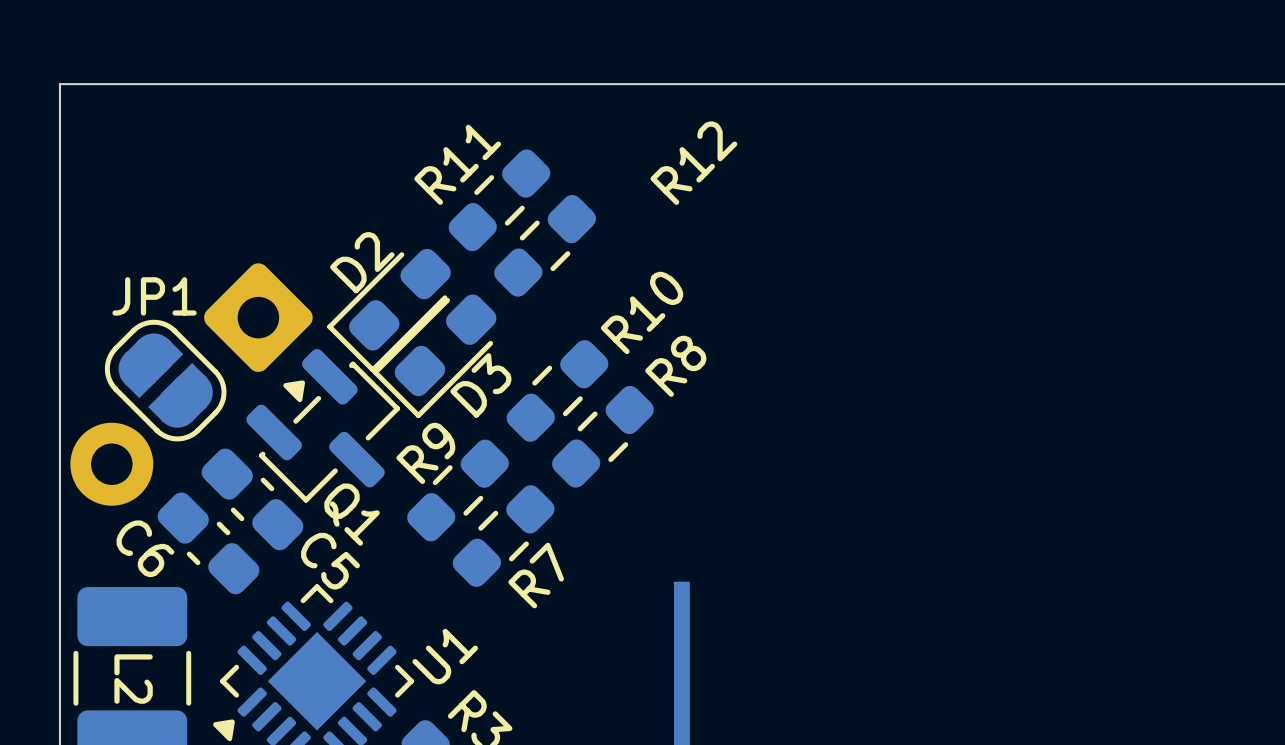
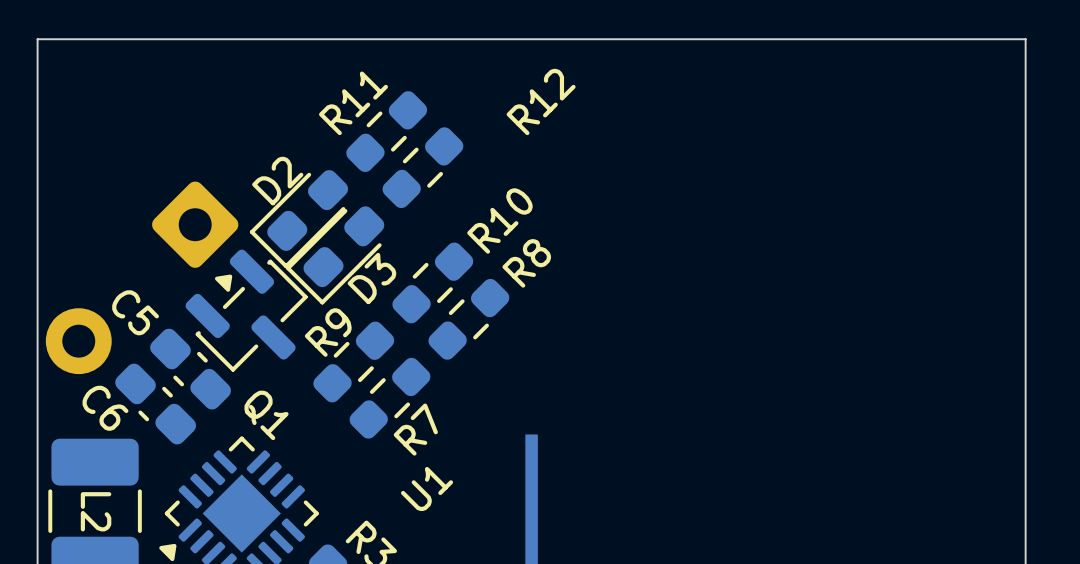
JP1: (165, 380) -> none
Q1 name position: Q1 (352, 514) -> Q1 (266, 415)
C5 name position: C5 (330, 561) -> C5 (135, 312)
U1 name position: U1 (445, 656) -> U1 (427, 488)

